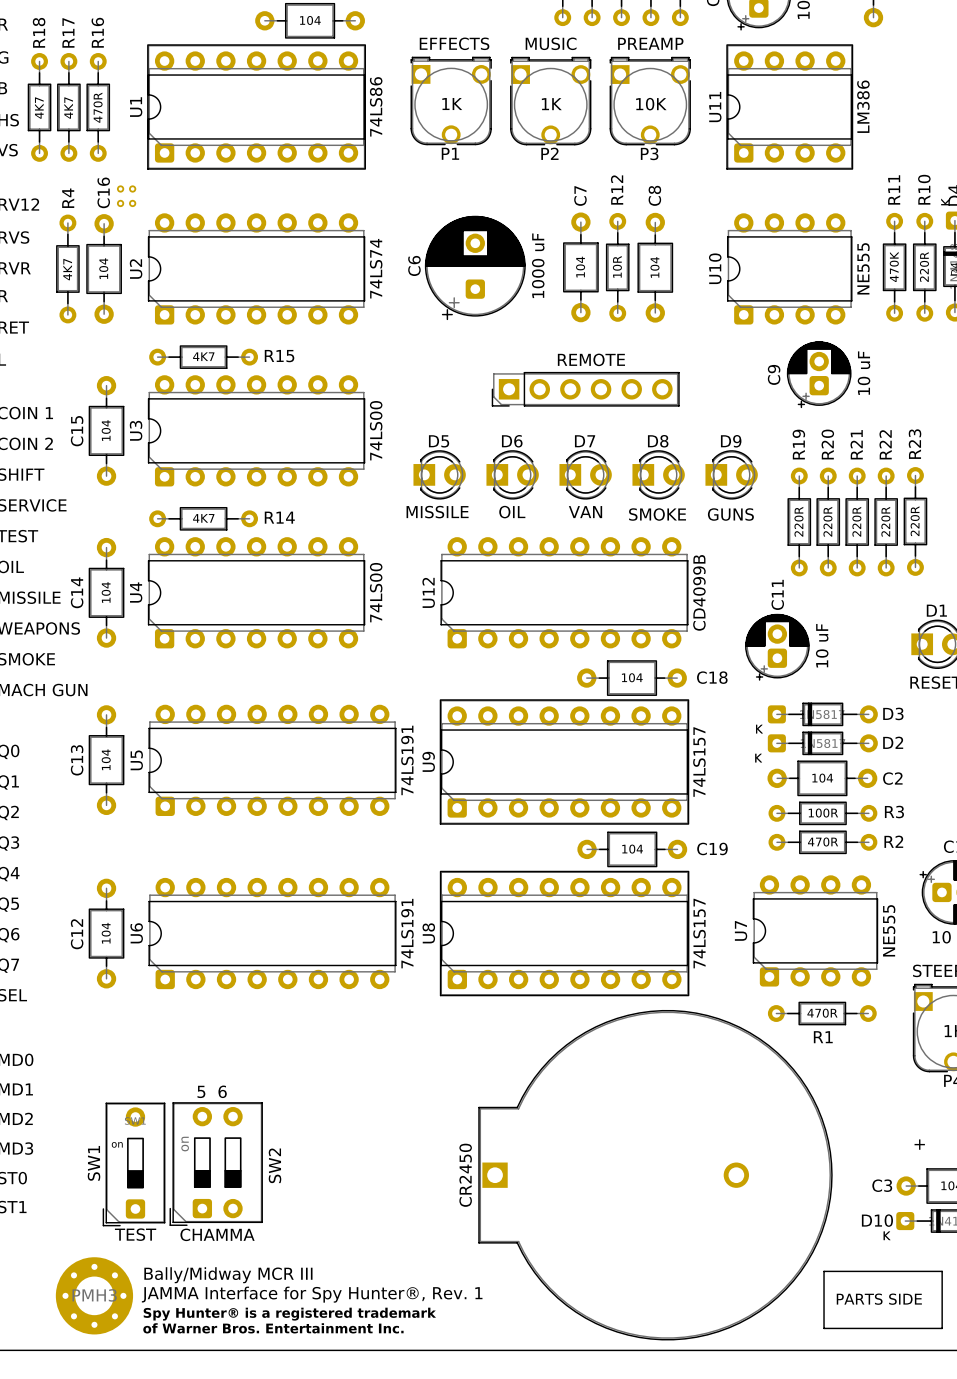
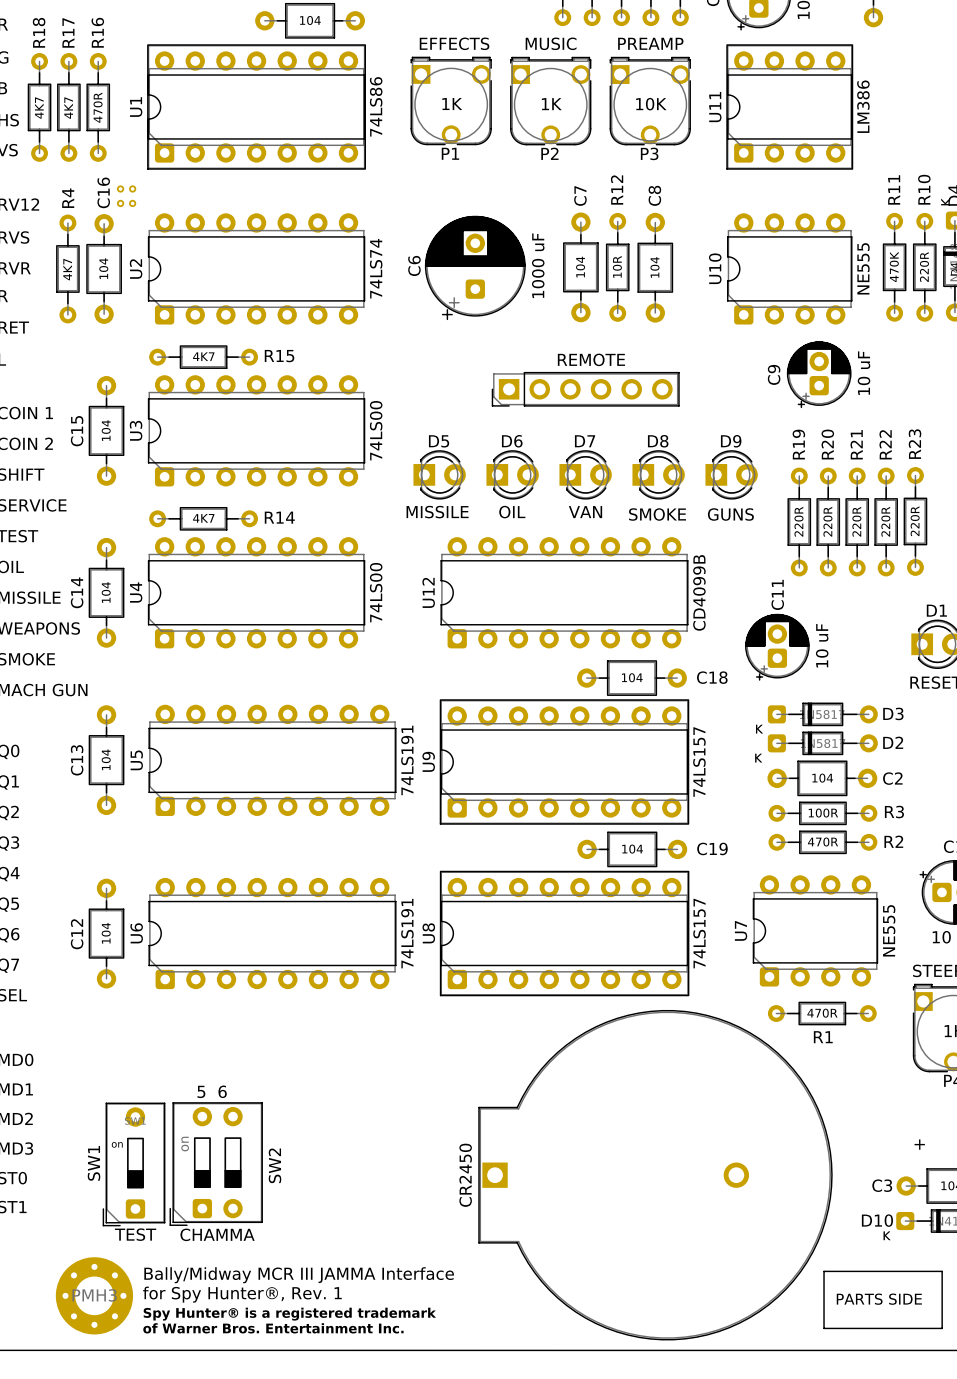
text: Bally/Midway MCR III (228, 1275) -> Bally/Midway MCR III JAMMA Interface (299, 1275)
text: JAMMA Interface for Spy Hunter®, Rev. 1 (312, 1294) -> for Spy Hunter®, Rev. 1 (242, 1294)

